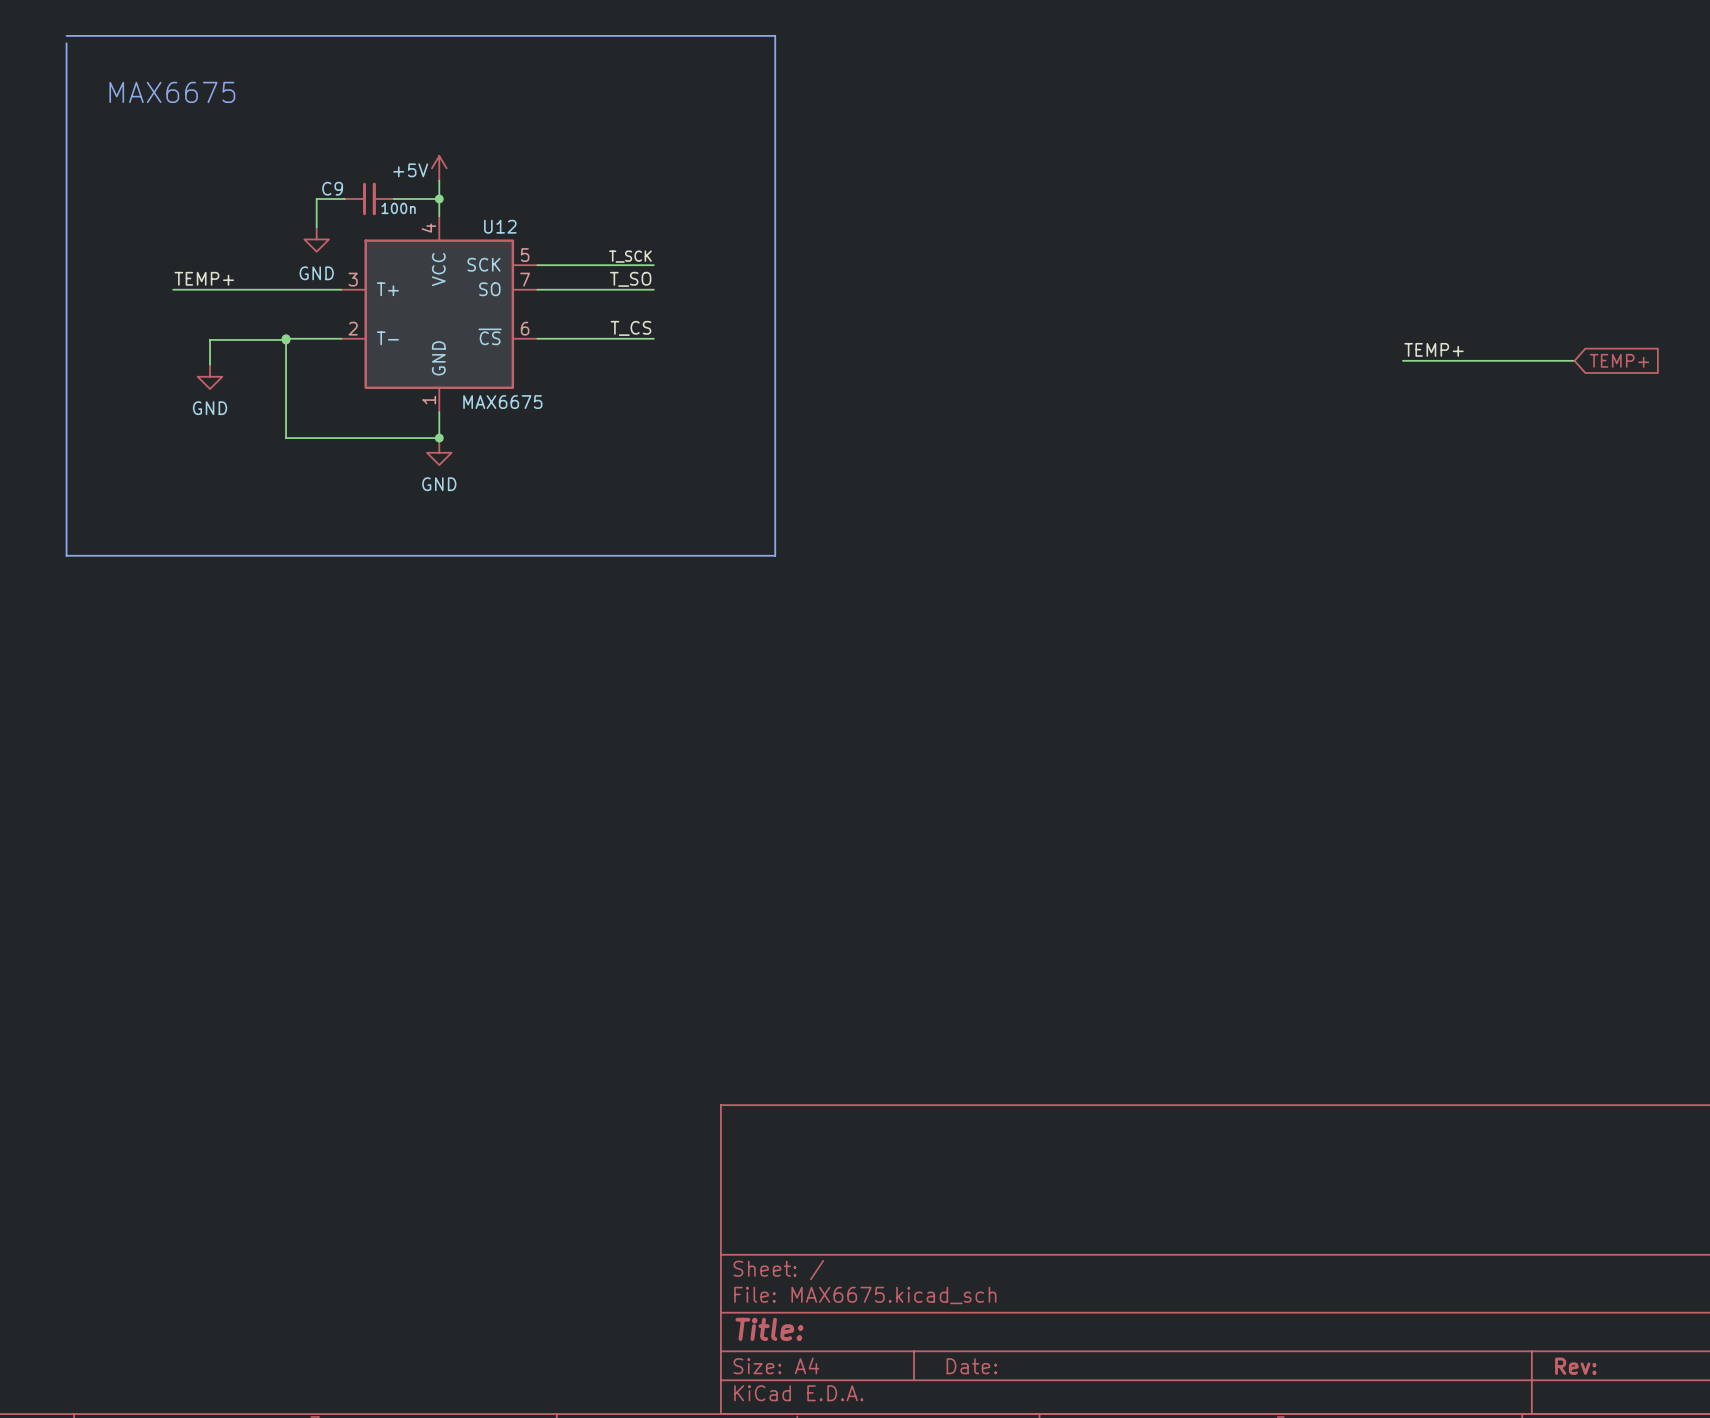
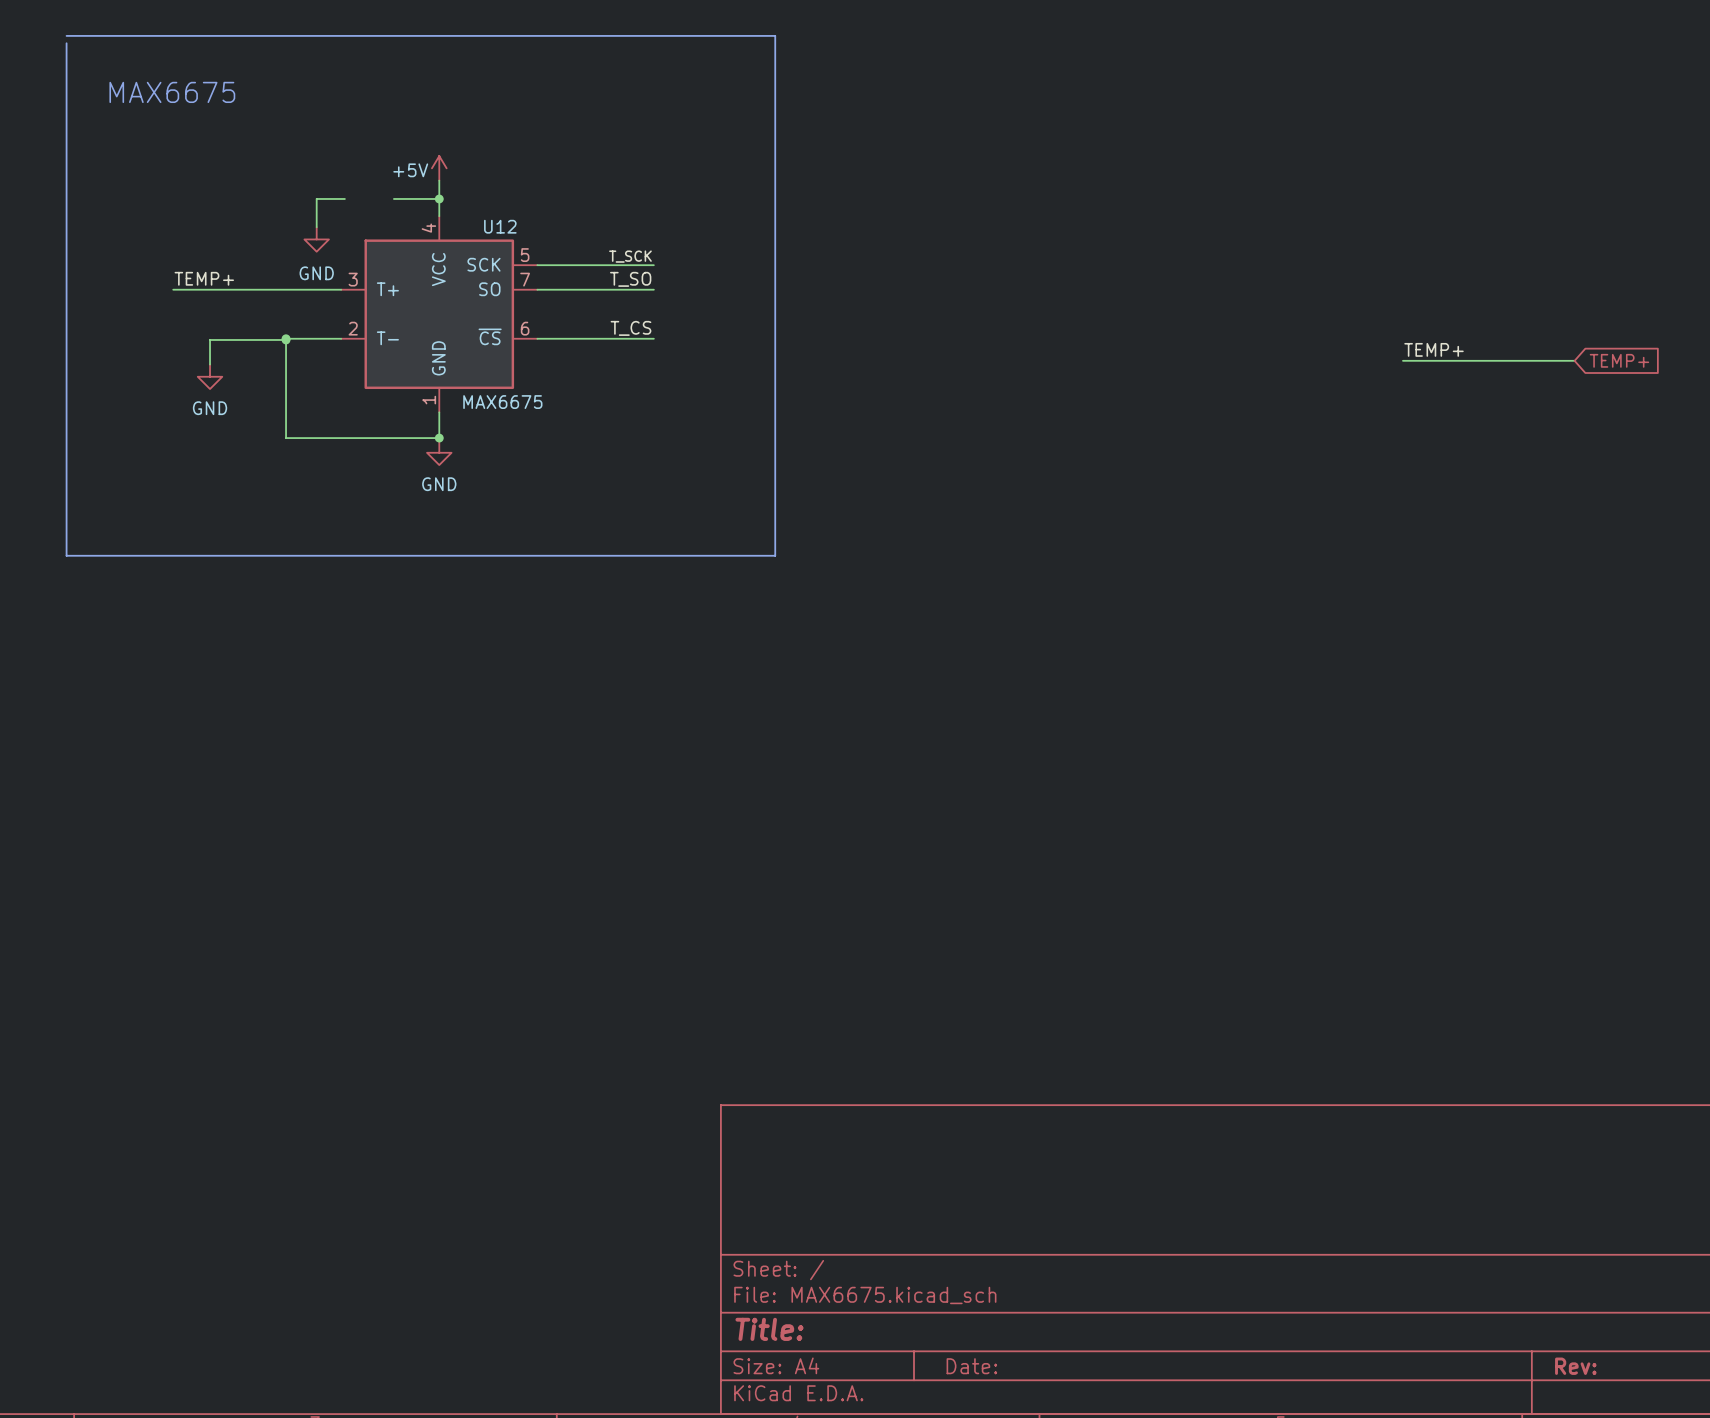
C9: 100n (369, 198) -> none

